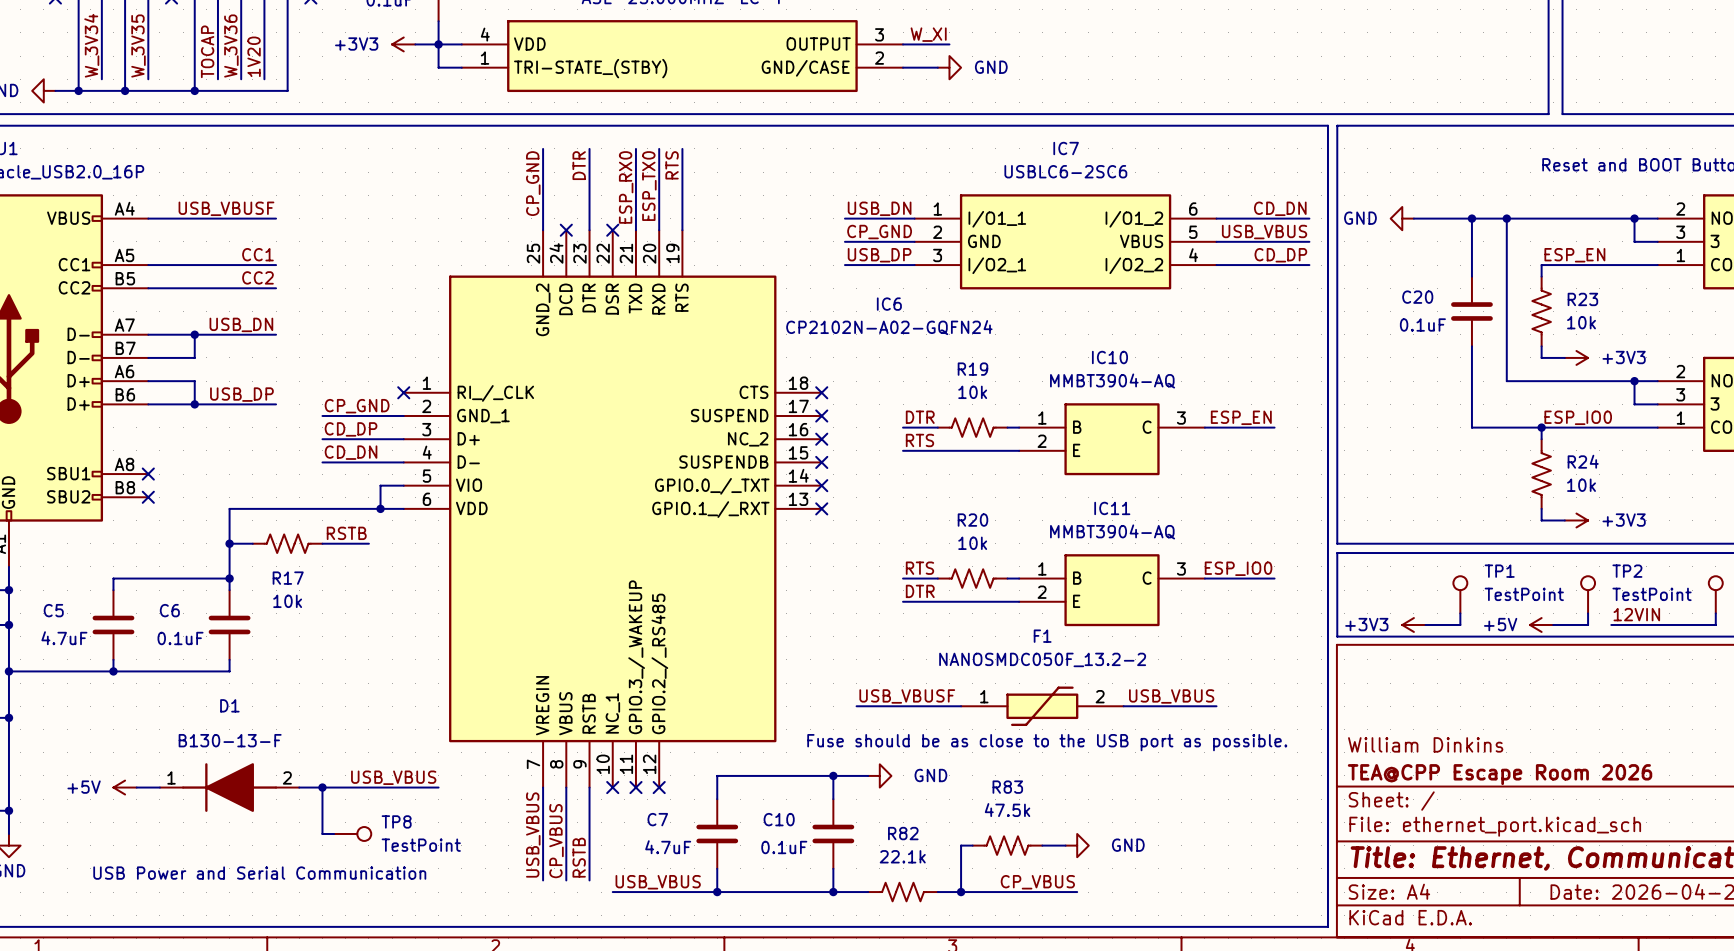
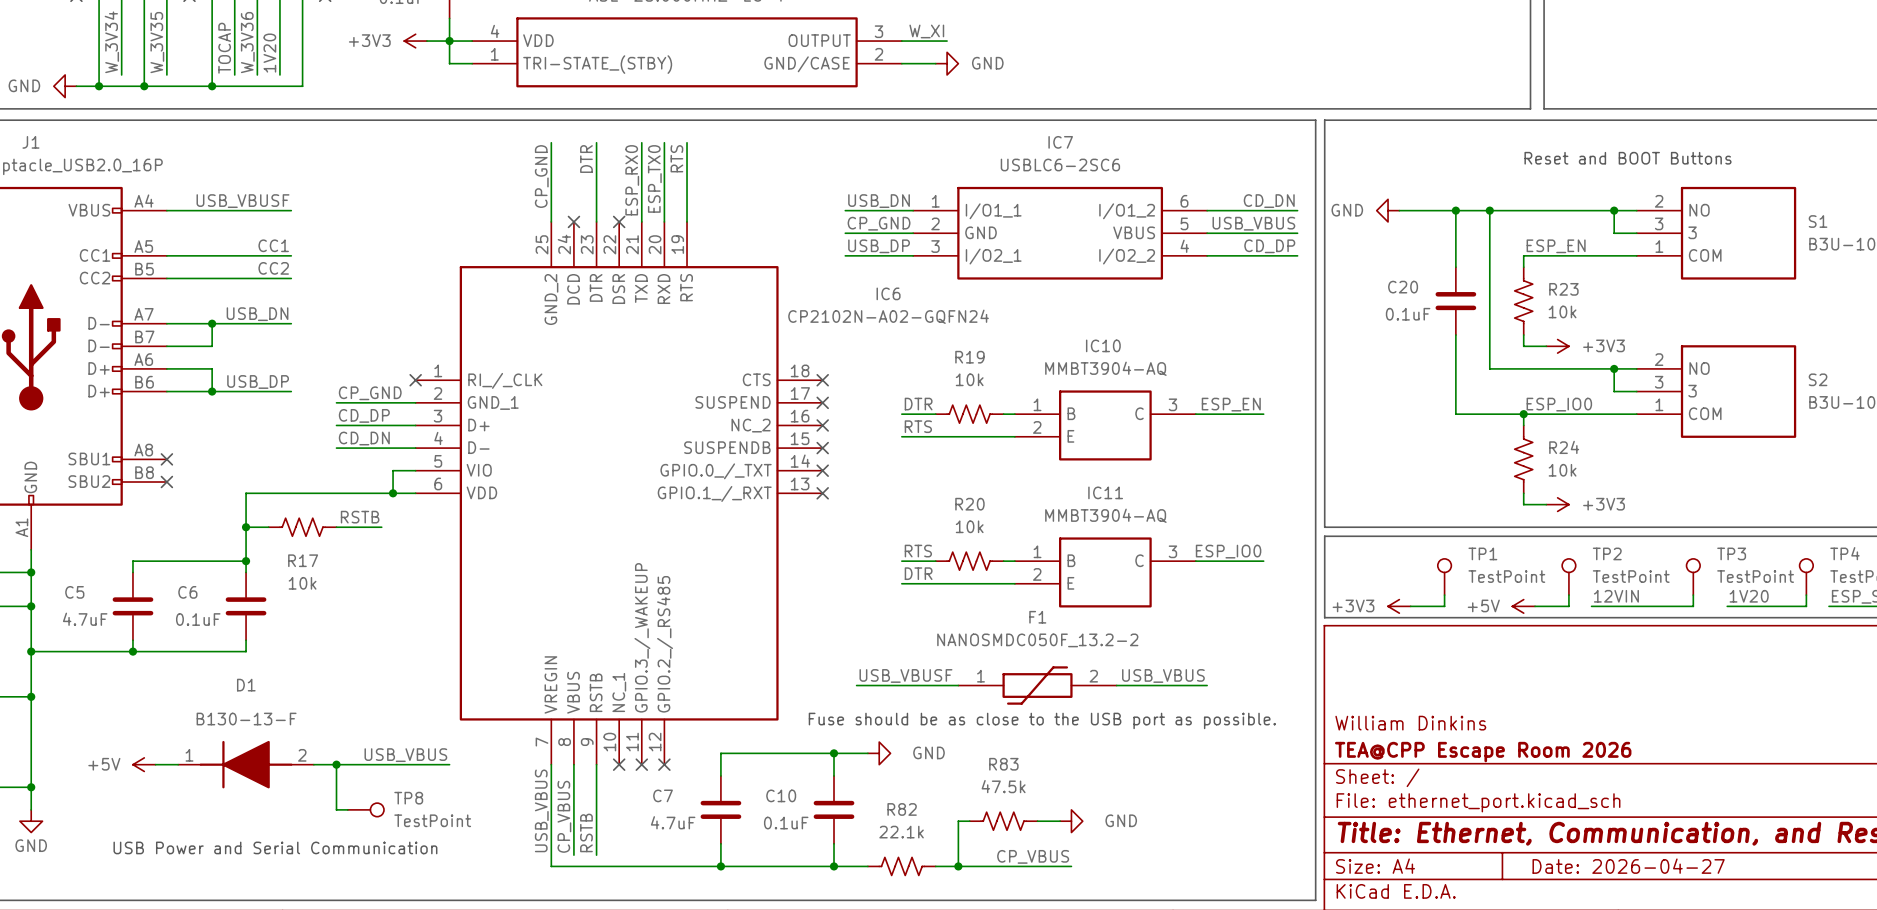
wire: none -> (551, 855) (551, 866) (619, 866)
label: USB_VBUS (658, 882) -> none

